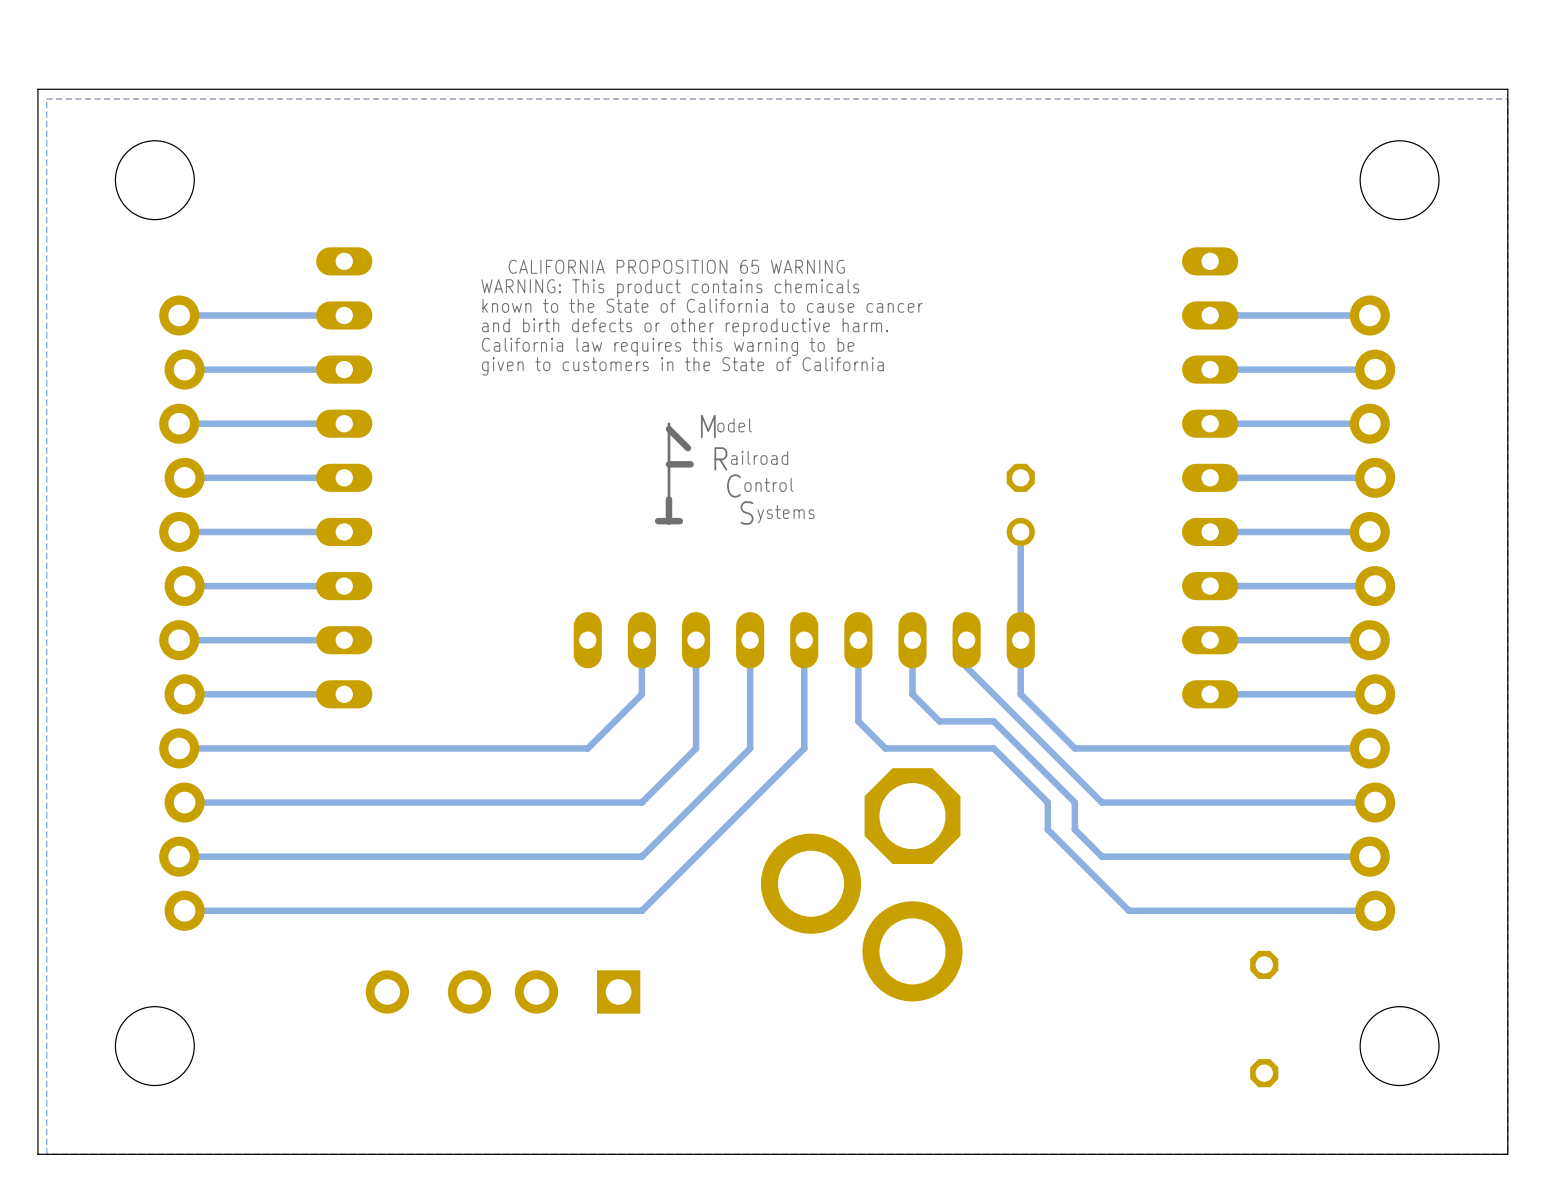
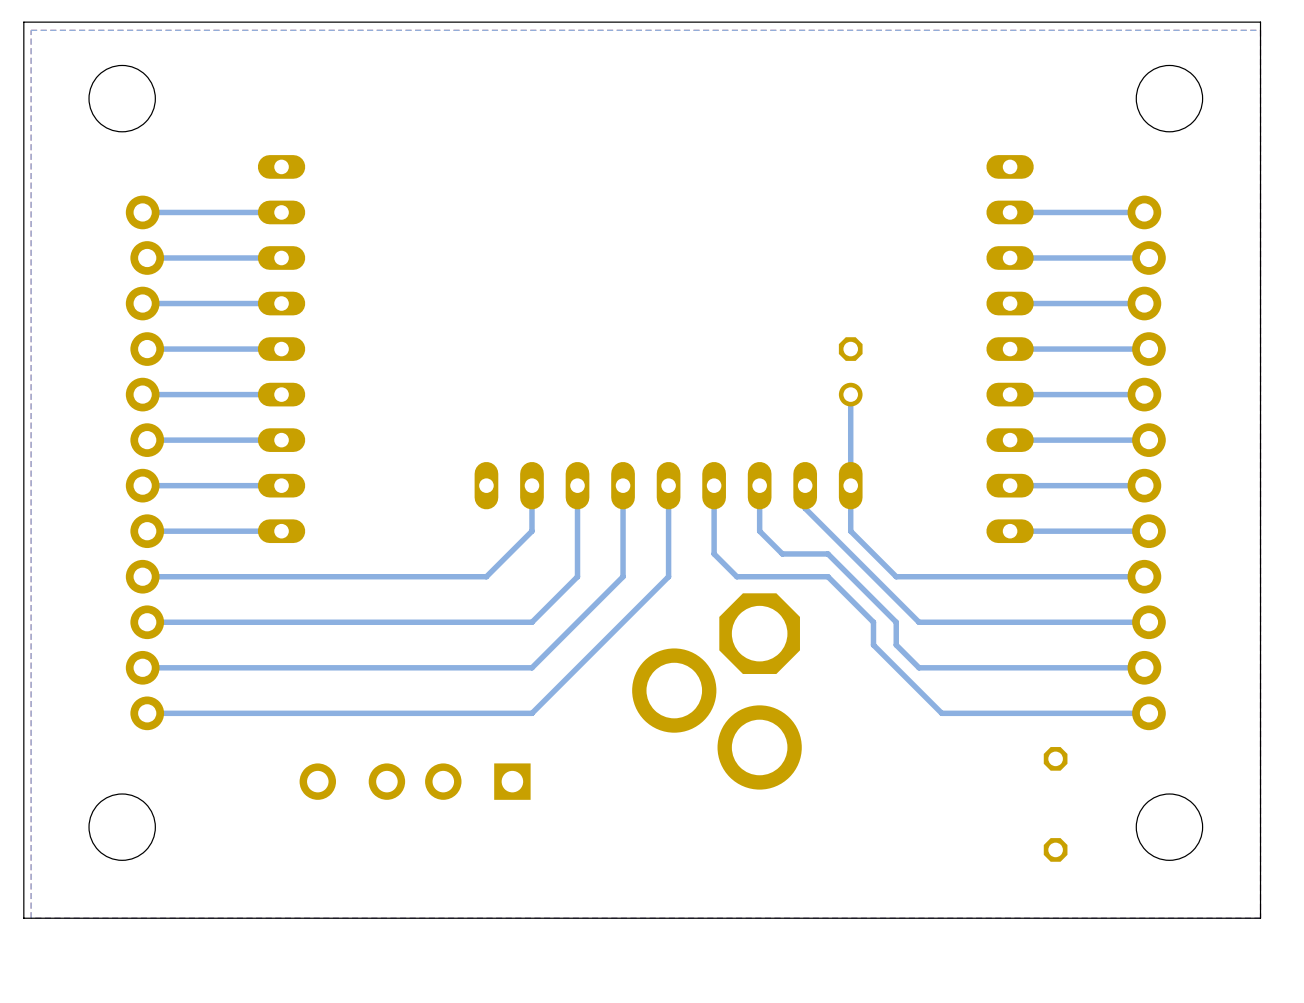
drawing: [481, 259, 923, 376] -> none
drawing: [654, 422, 694, 525] -> none

